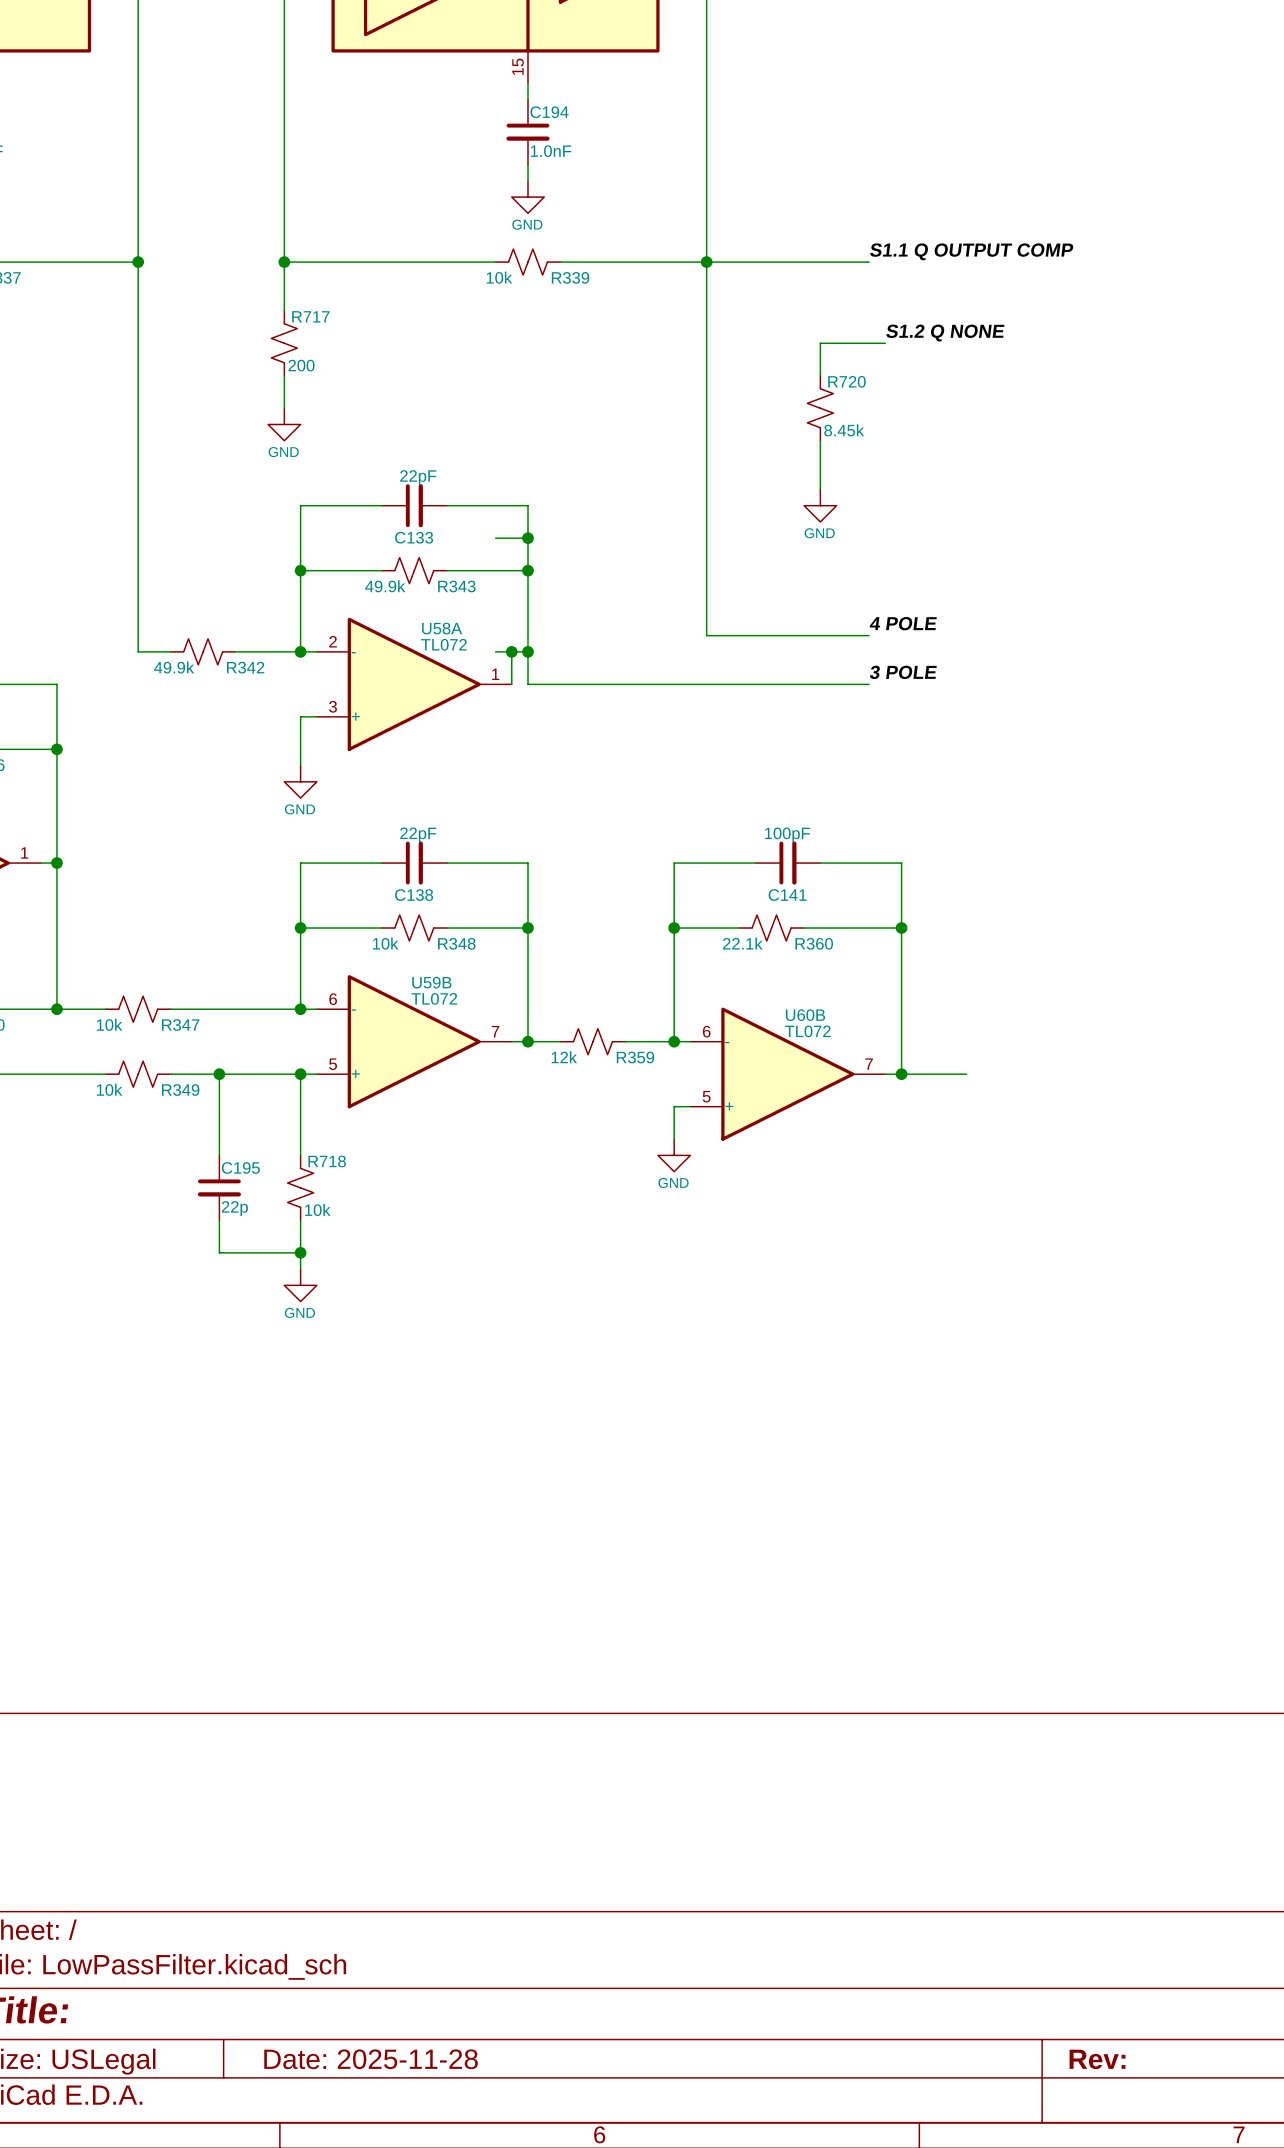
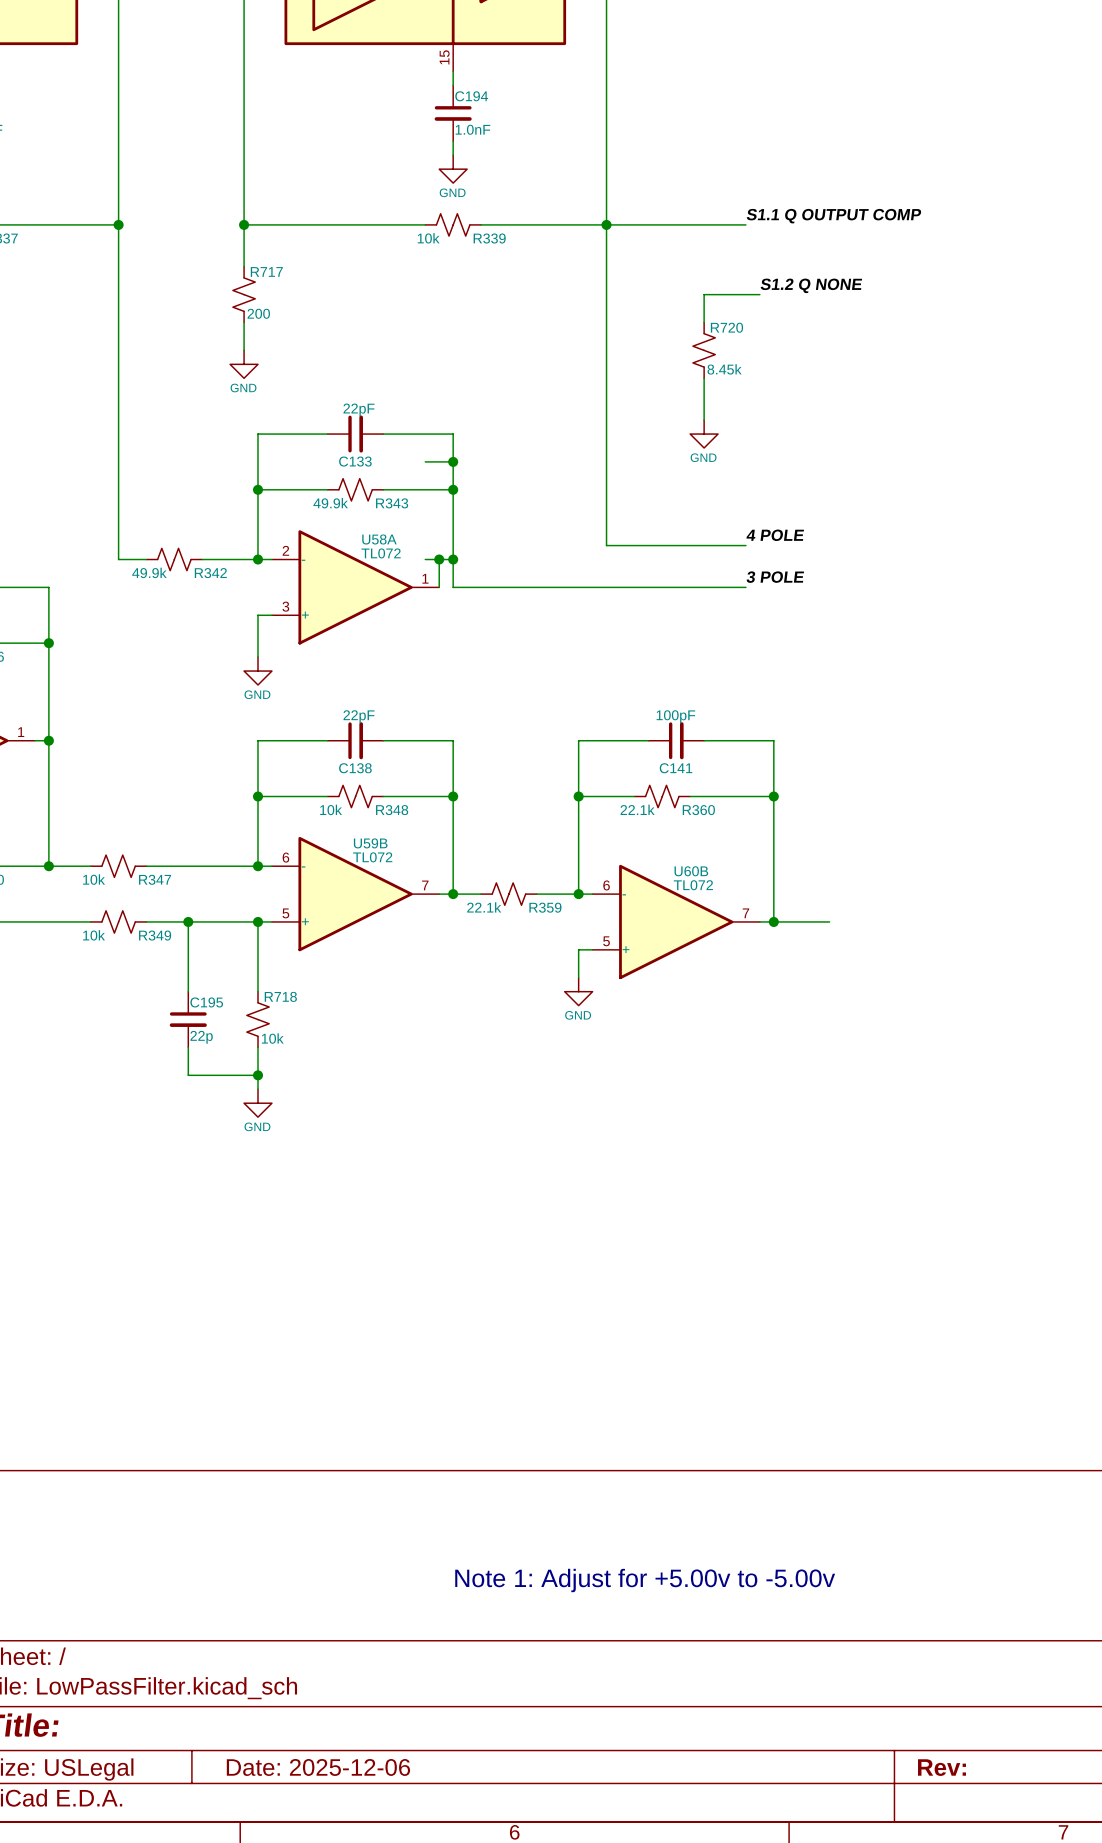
R359 value: 12k (564, 1057) -> 22.1k (484, 907)
text: none -> Note 1: Adjust for +5.00v to -5.00v (645, 1580)
title block: Date: 2025-11-28 (371, 2059) -> Date: 2025-12-06 (318, 1767)

